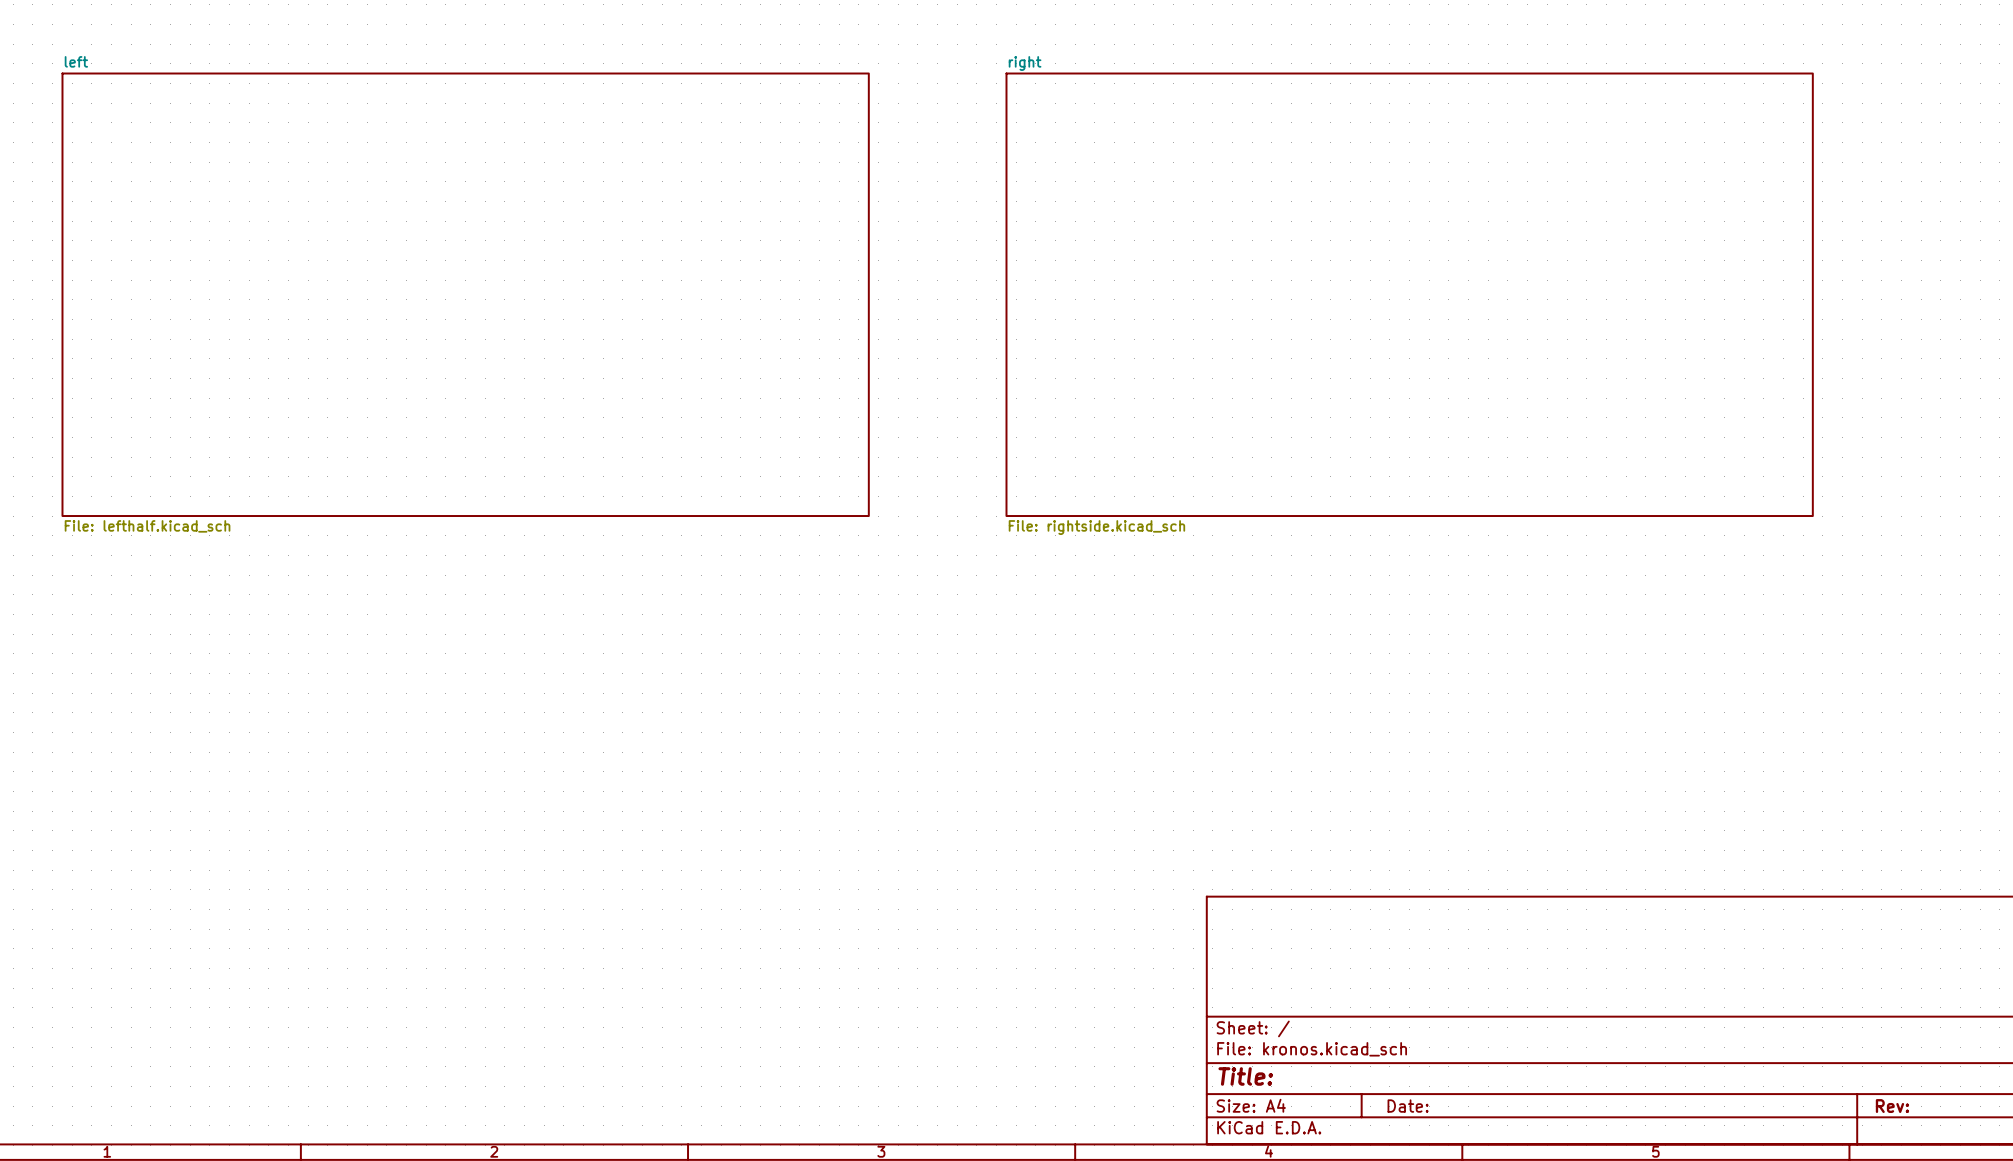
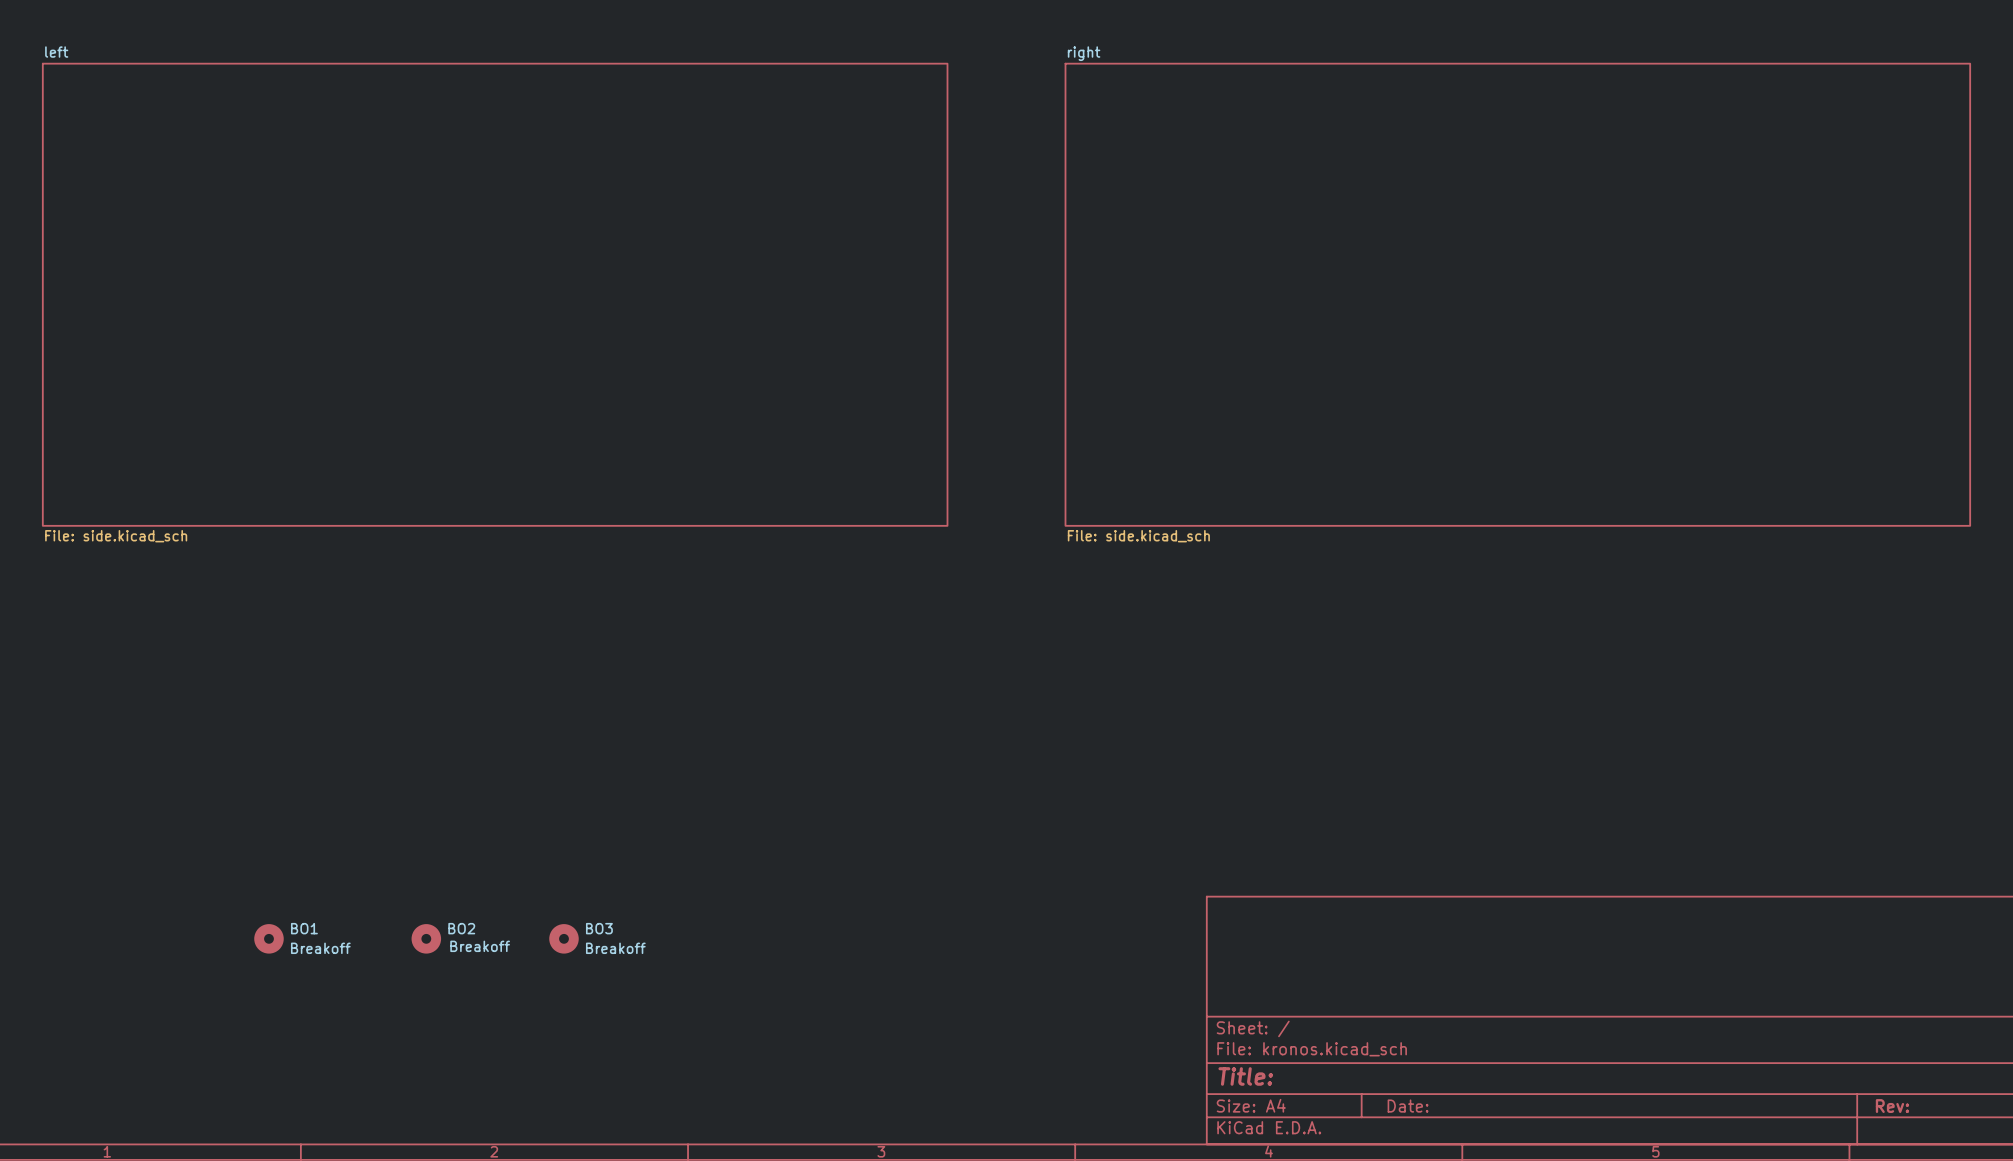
sheet left: File: lefthalf.kicad_sch (465, 294) -> none
sheet left: none -> File: side.kicad_sch (495, 294)
sheet right: File: rightside.kicad_sch (1409, 294) -> none
sheet right: none -> File: side.kicad_sch (1517, 294)
BO1: none -> Breakoff (268, 938)
BO2: none -> Breakoff (426, 938)
BO3: none -> Breakoff (563, 938)

